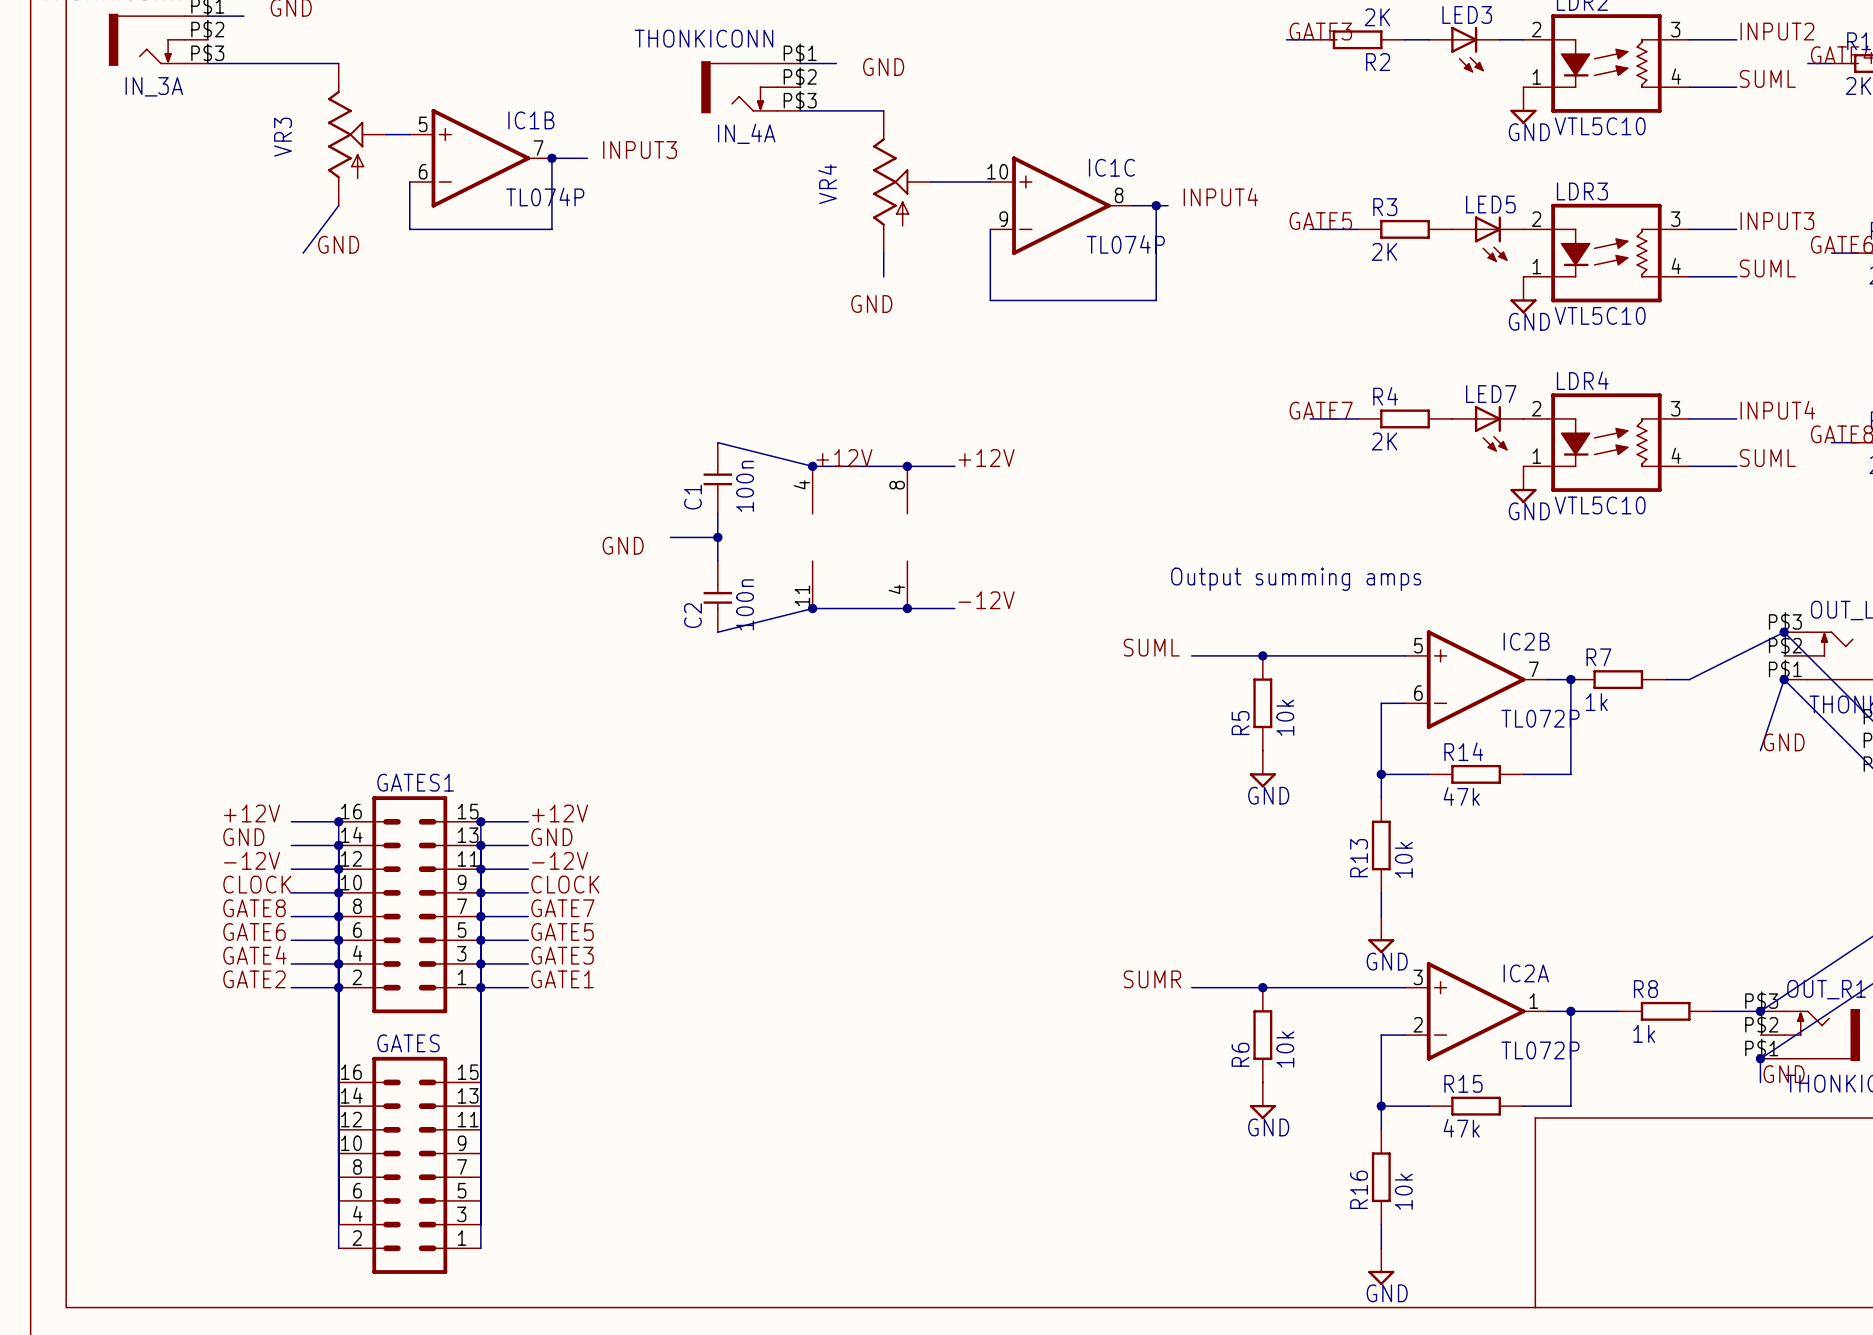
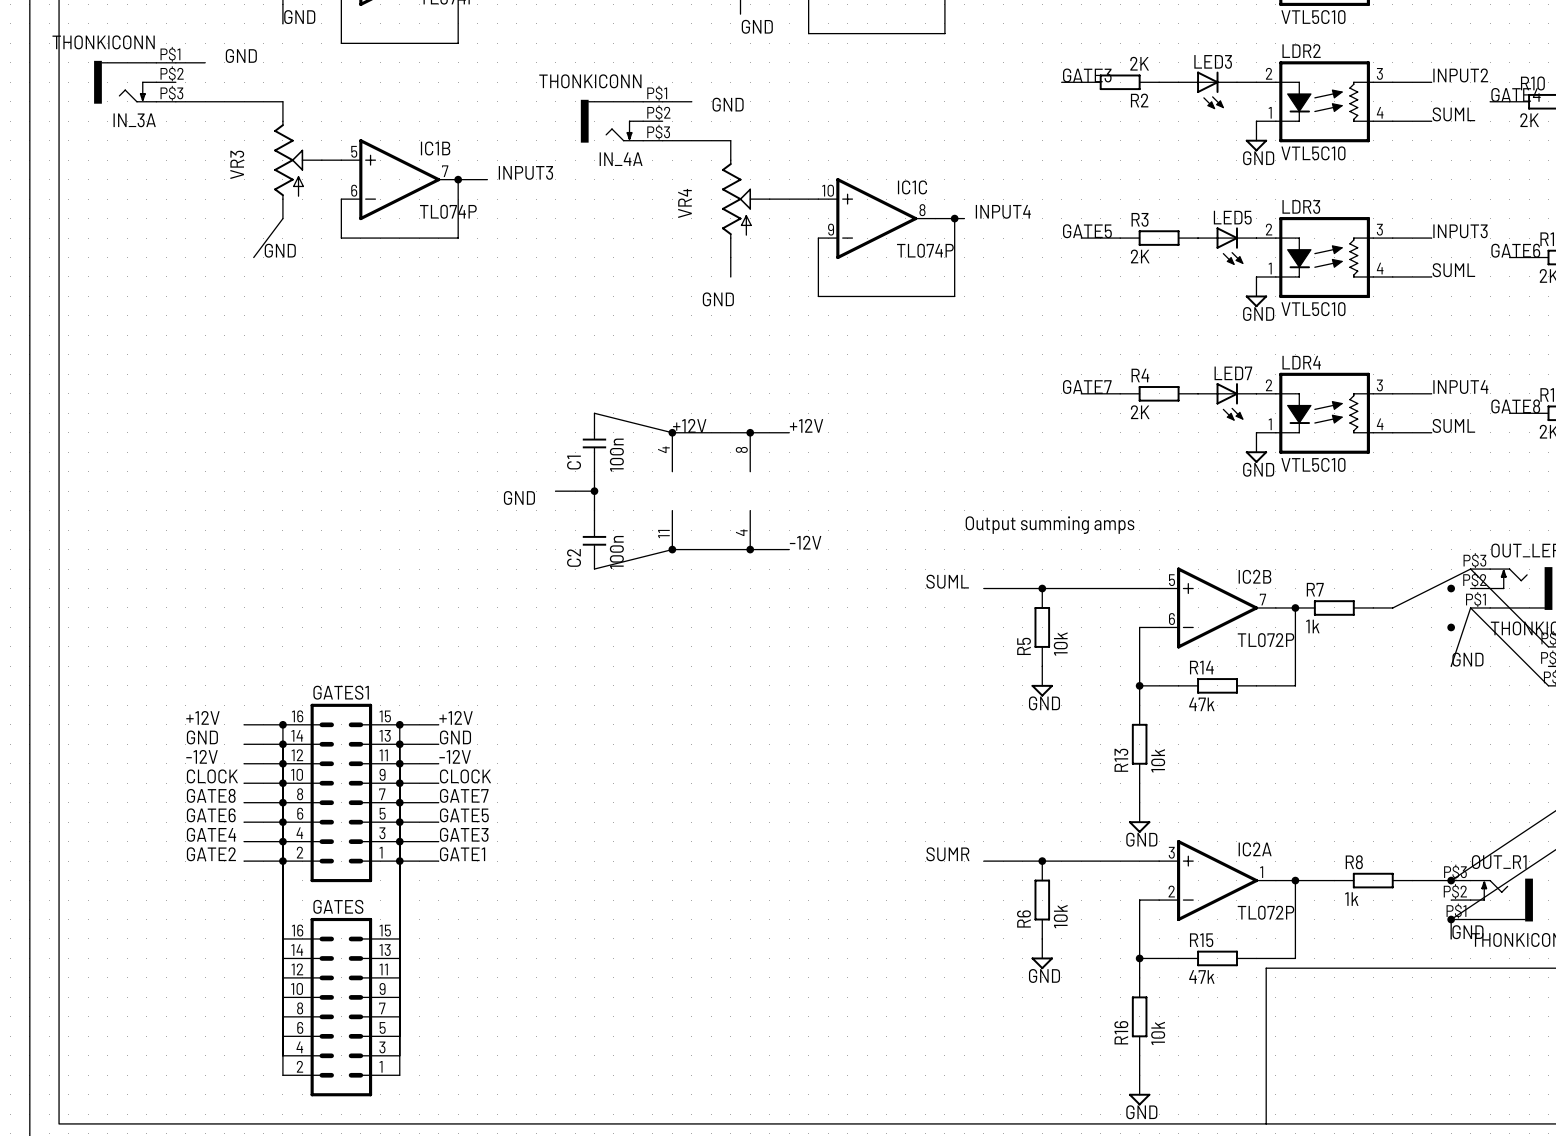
junction: (1784, 632) -> none
junction: none -> (1451, 588)
junction: (1784, 679) -> none
junction: none -> (1451, 627)

